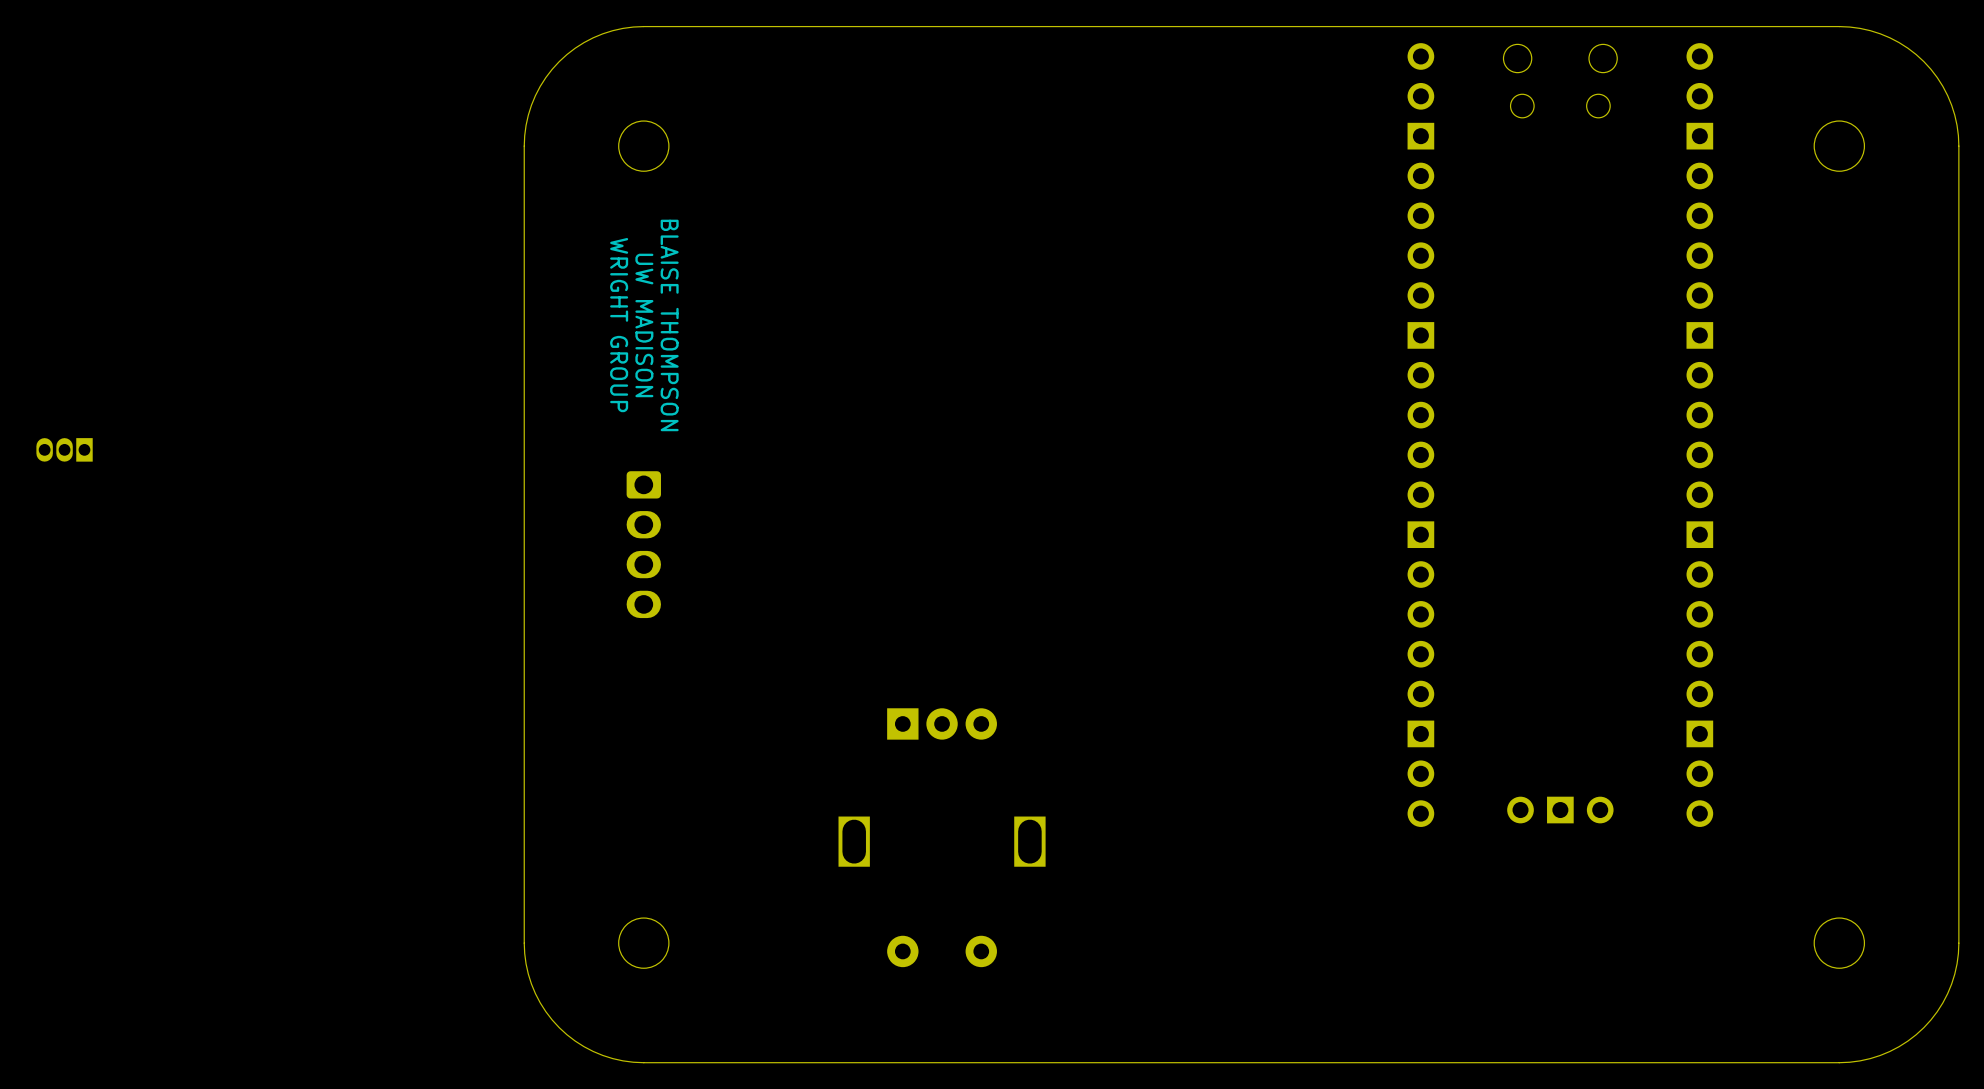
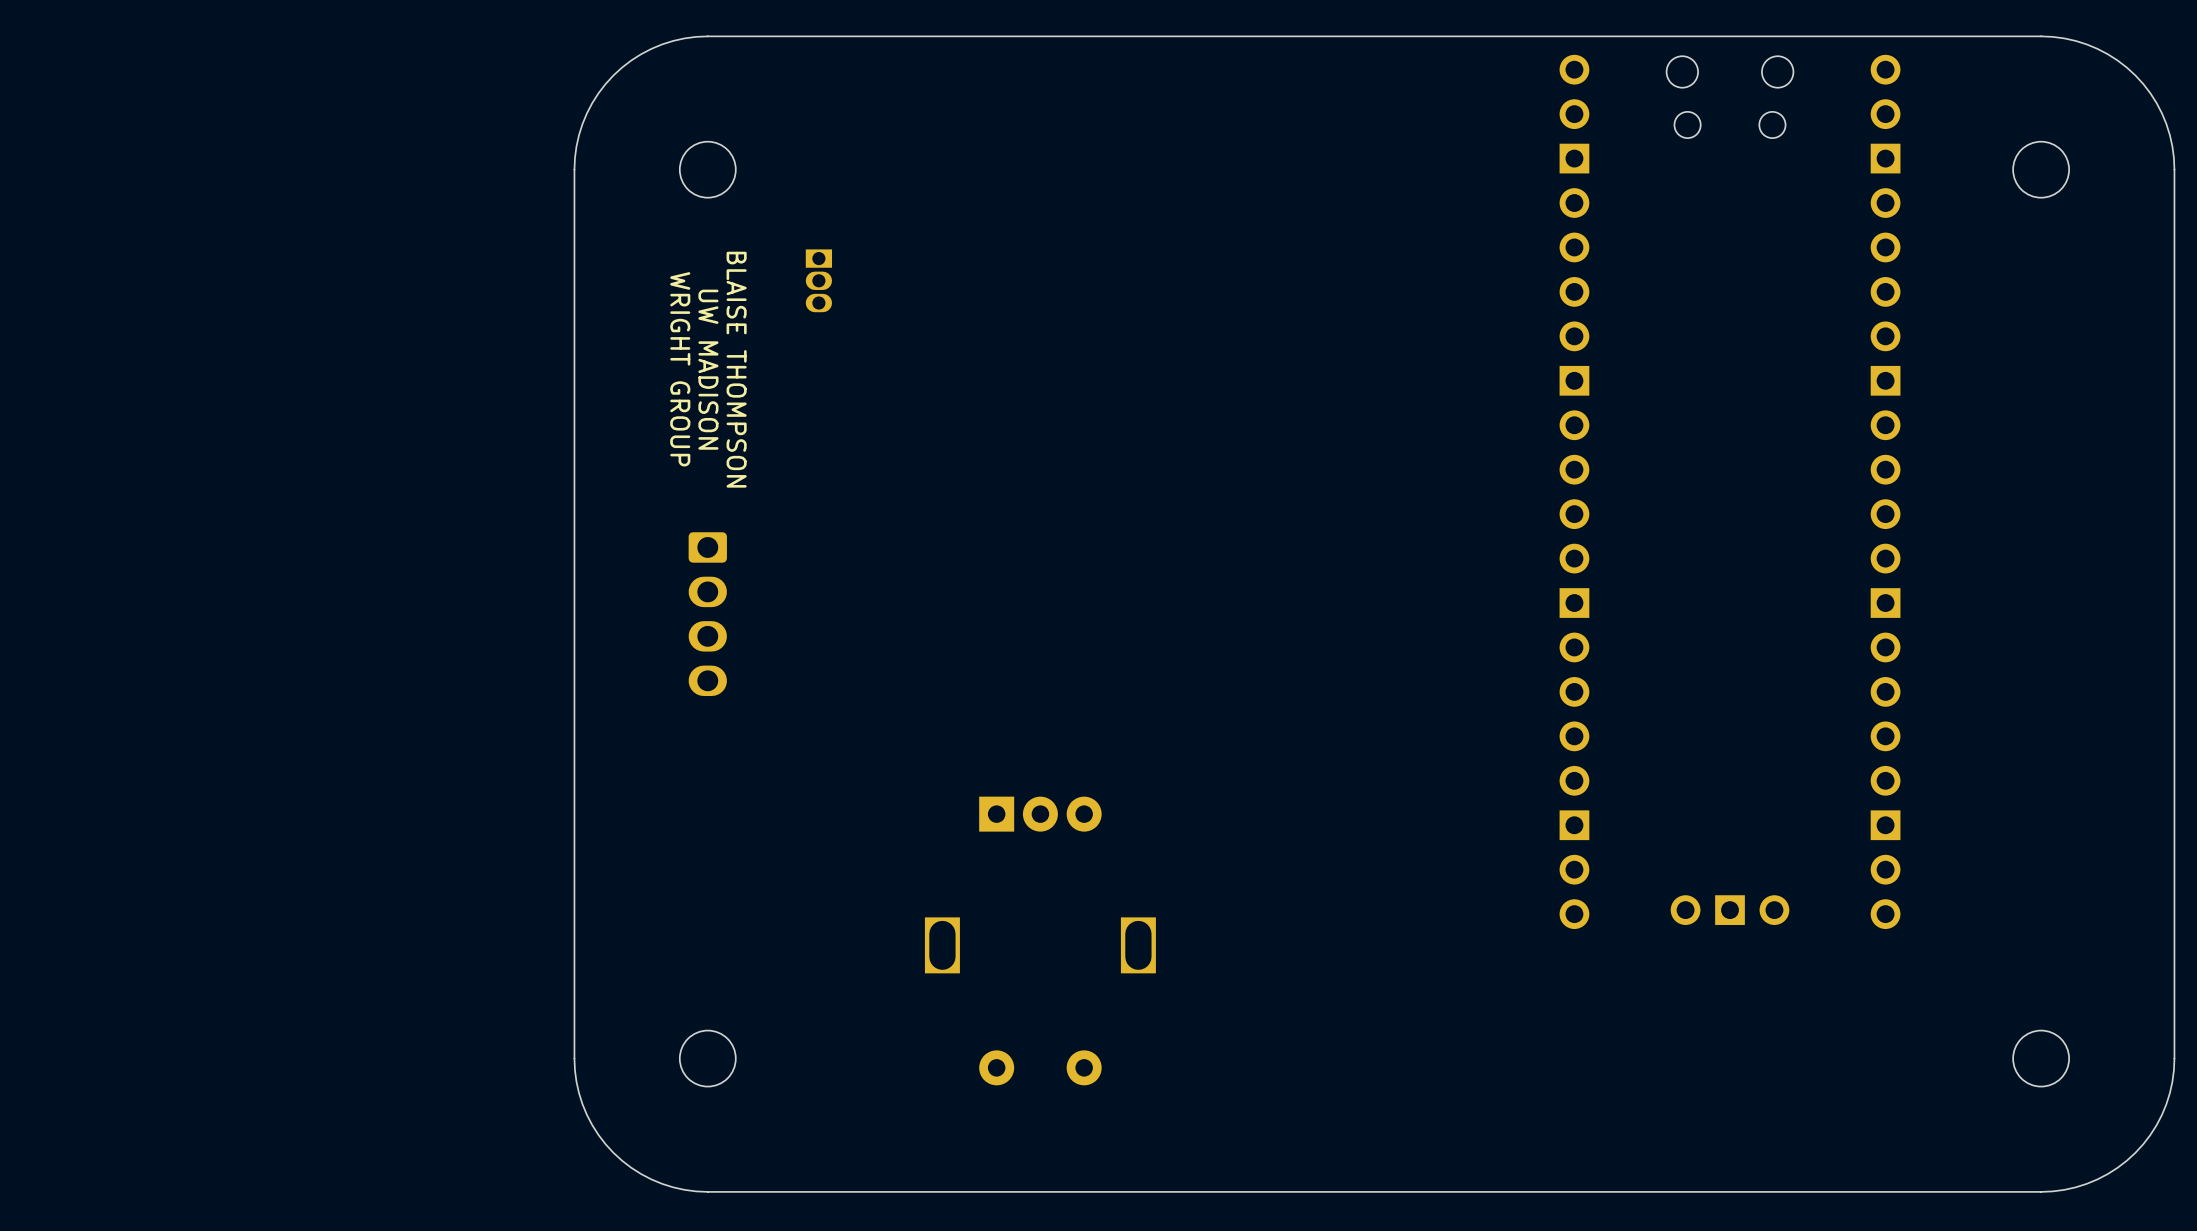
part: none -> (818, 280)
part: (64, 449) -> none

